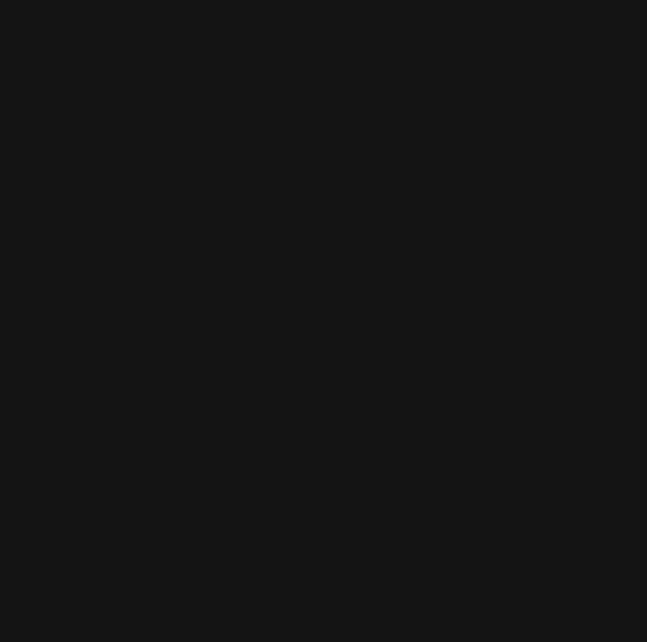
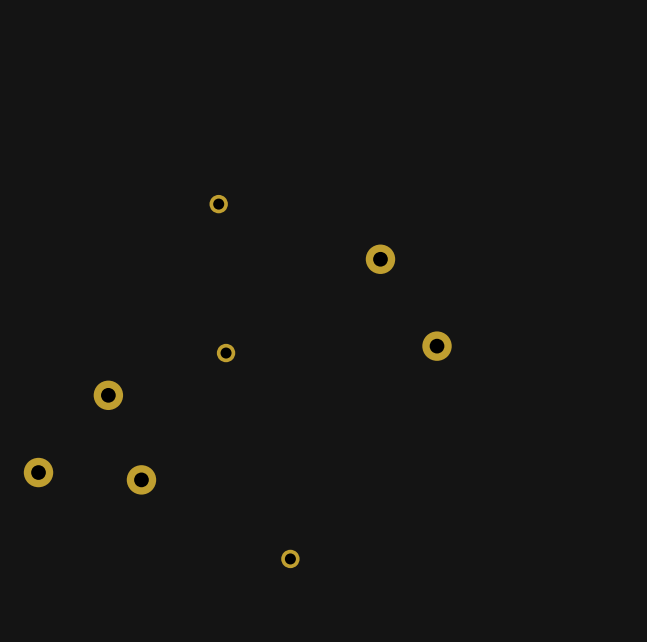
via: none -> (218, 204)
via: none -> (380, 259)
via: none -> (437, 346)
via: none -> (226, 353)
via: none -> (108, 395)
via: none -> (38, 472)
via: none -> (141, 479)
via: none -> (290, 558)

